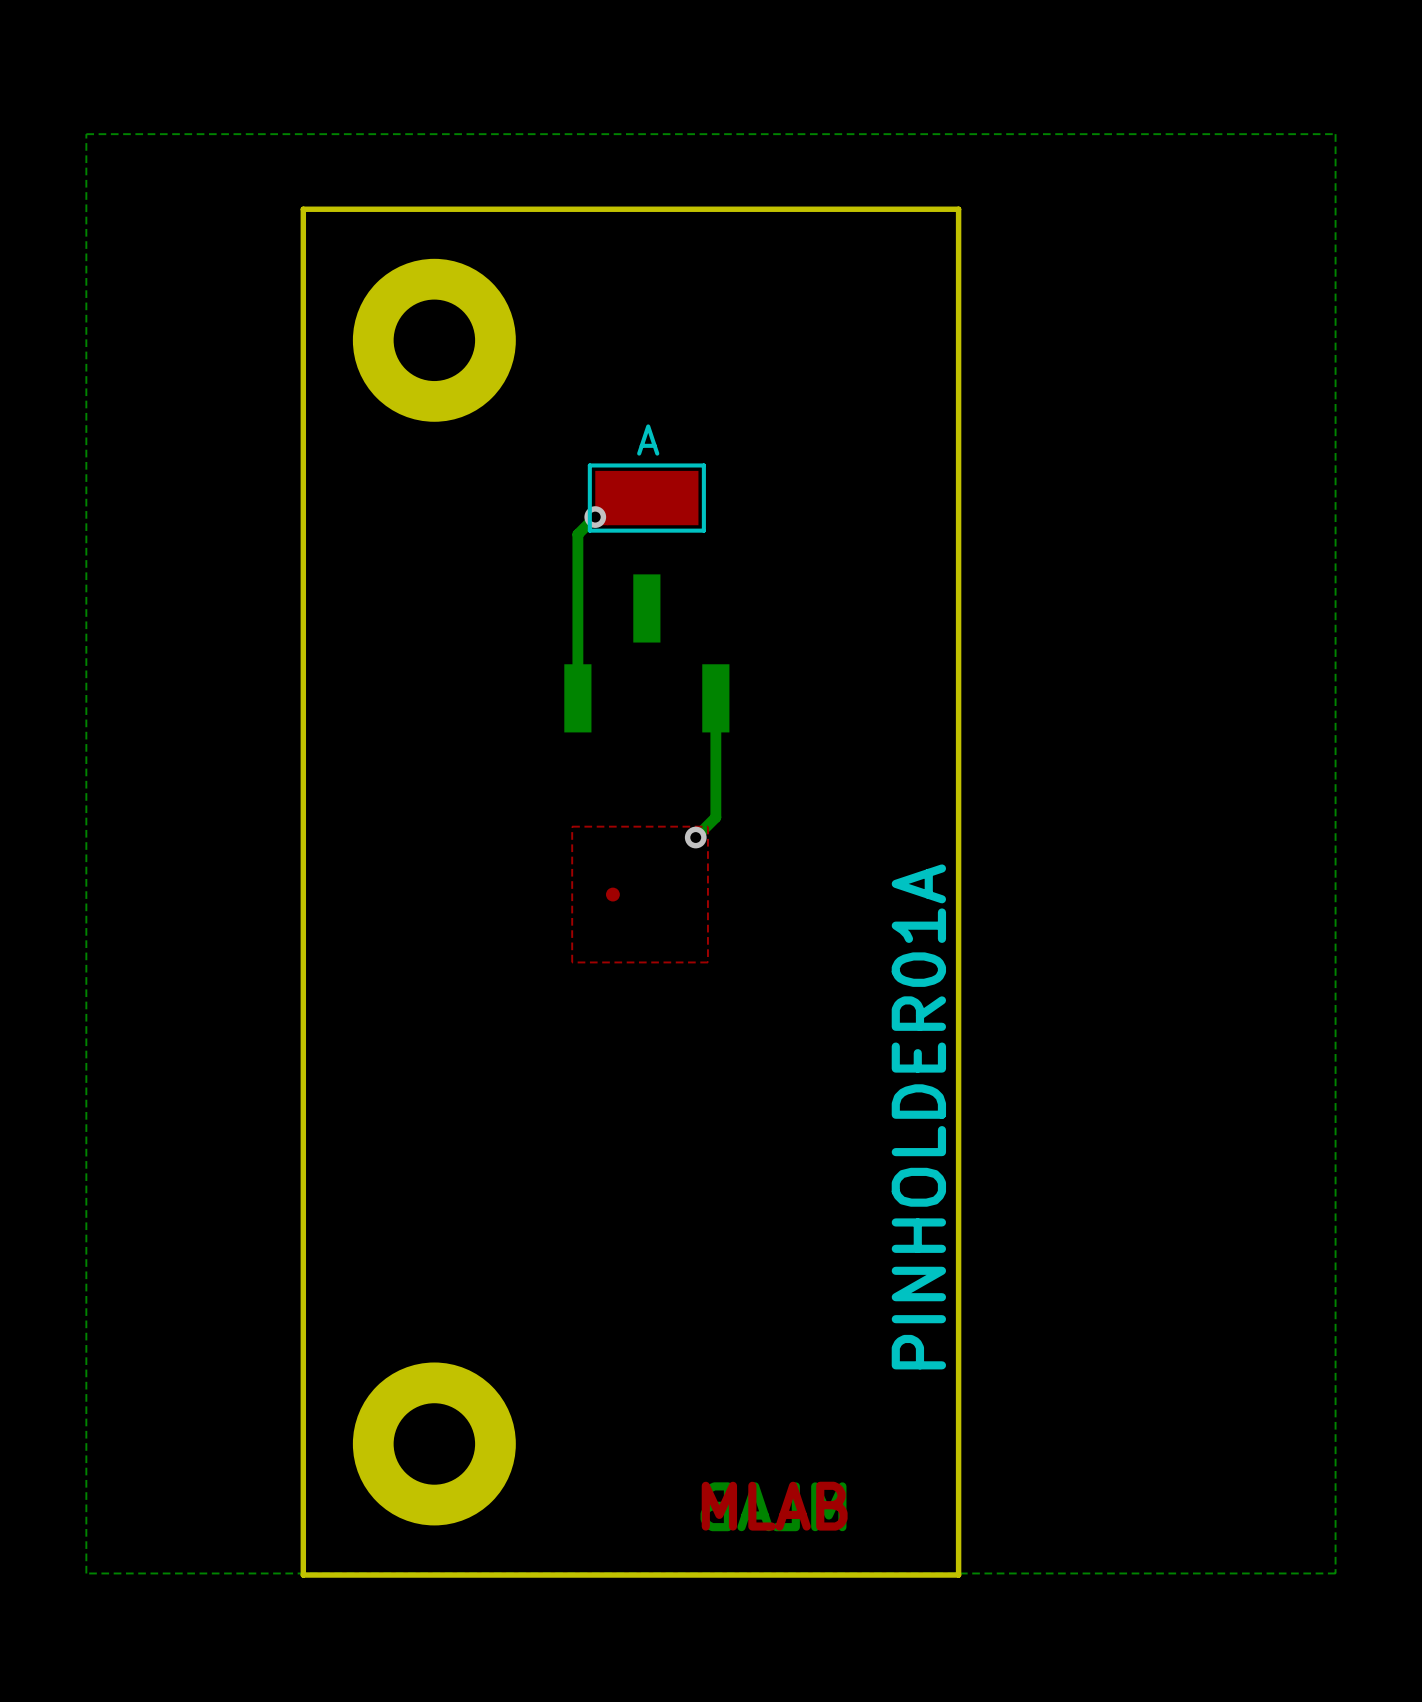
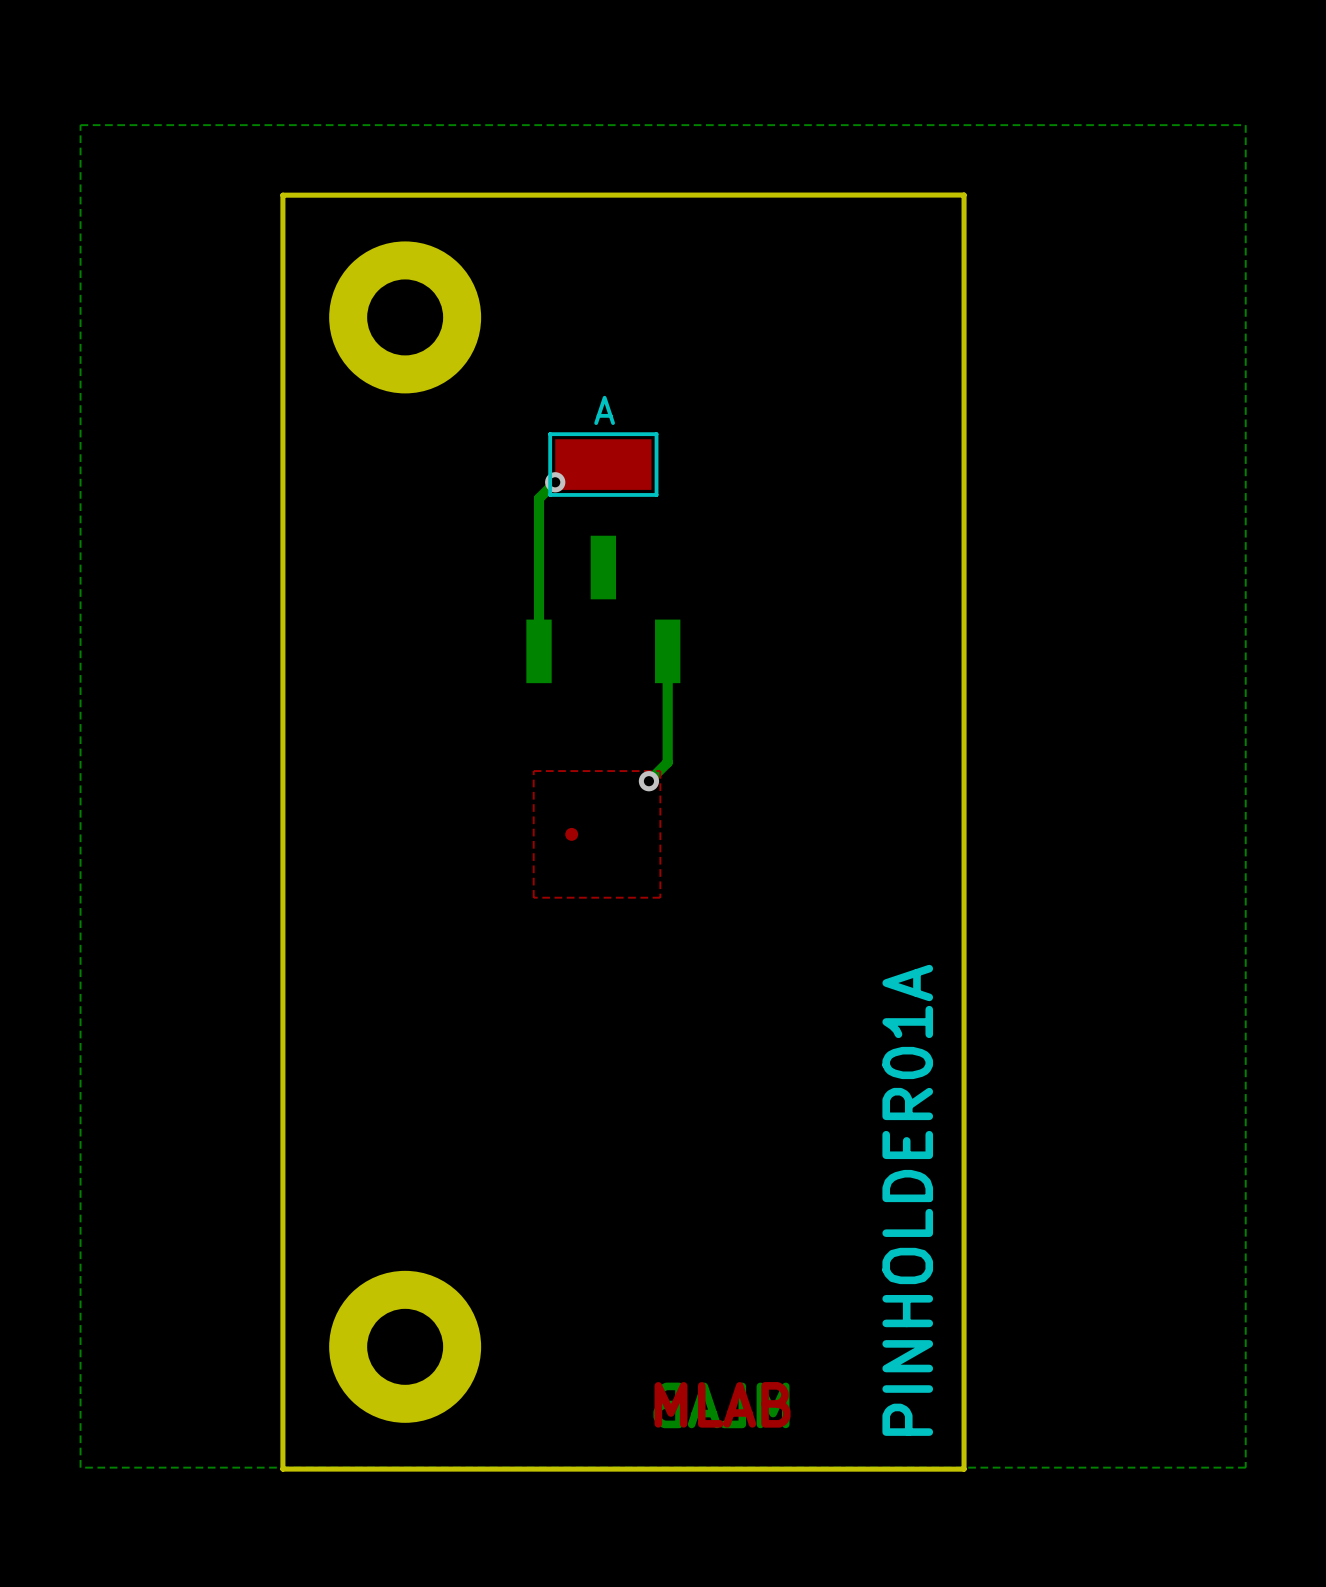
board edge: (303, 209) (958, 209) (958, 1575) (303, 1575) -> (282, 195) (964, 195) (964, 1469) (282, 1469)
text position: PINHOLDER01A (918, 1116) -> PINHOLDER01A (907, 1200)

